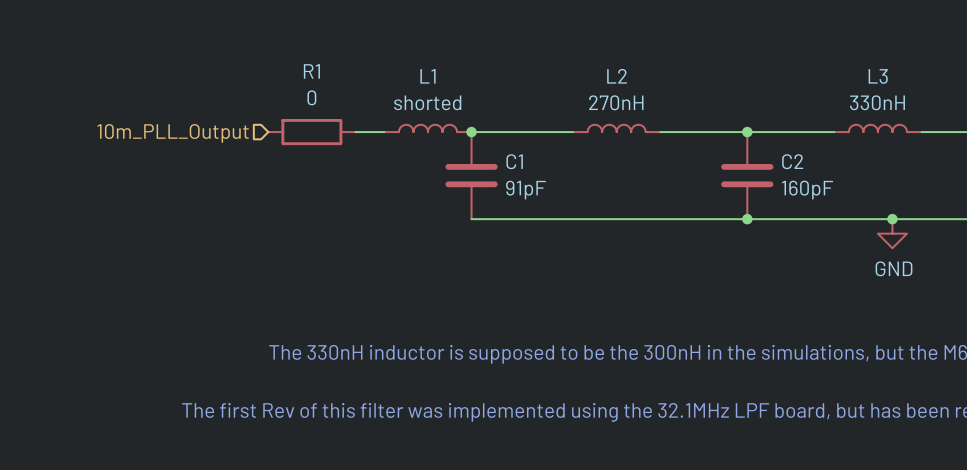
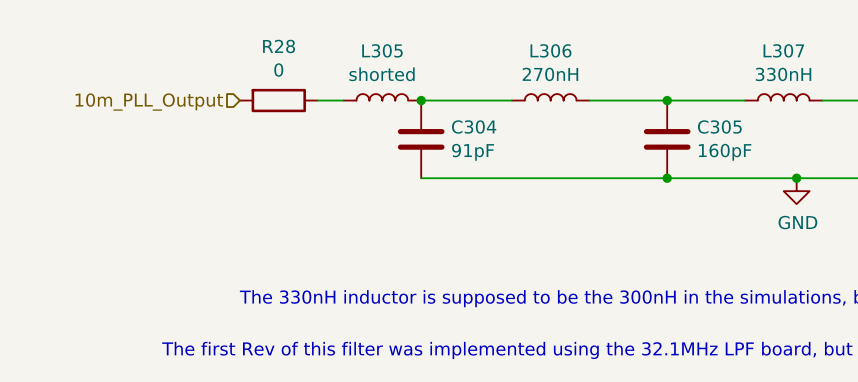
R1 name: R1 (311, 71) -> R28 (279, 46)
L1 name: L1 (428, 76) -> L305 (382, 50)
L2 name: L2 (617, 76) -> L306 (550, 50)
L3 name: L3 (878, 76) -> L307 (783, 50)
C1 name: C1 (514, 161) -> C304 (474, 126)
C2 name: C2 (792, 161) -> C305 (719, 126)

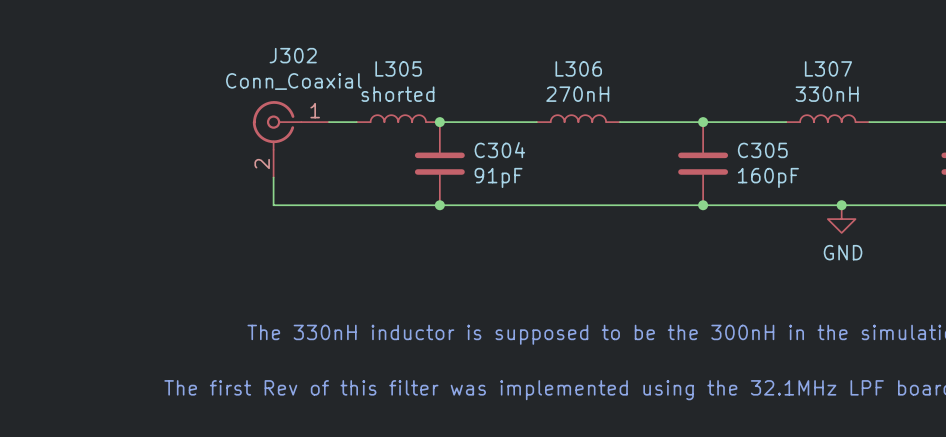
R28: 0 (278, 100) -> none
hierarchical label: 10m_PLL_Output (149, 102) -> none
J302: none -> Conn_Coaxial (290, 139)
wire: none -> (273, 177) (273, 205) (439, 205)
junction: none -> (439, 205)

